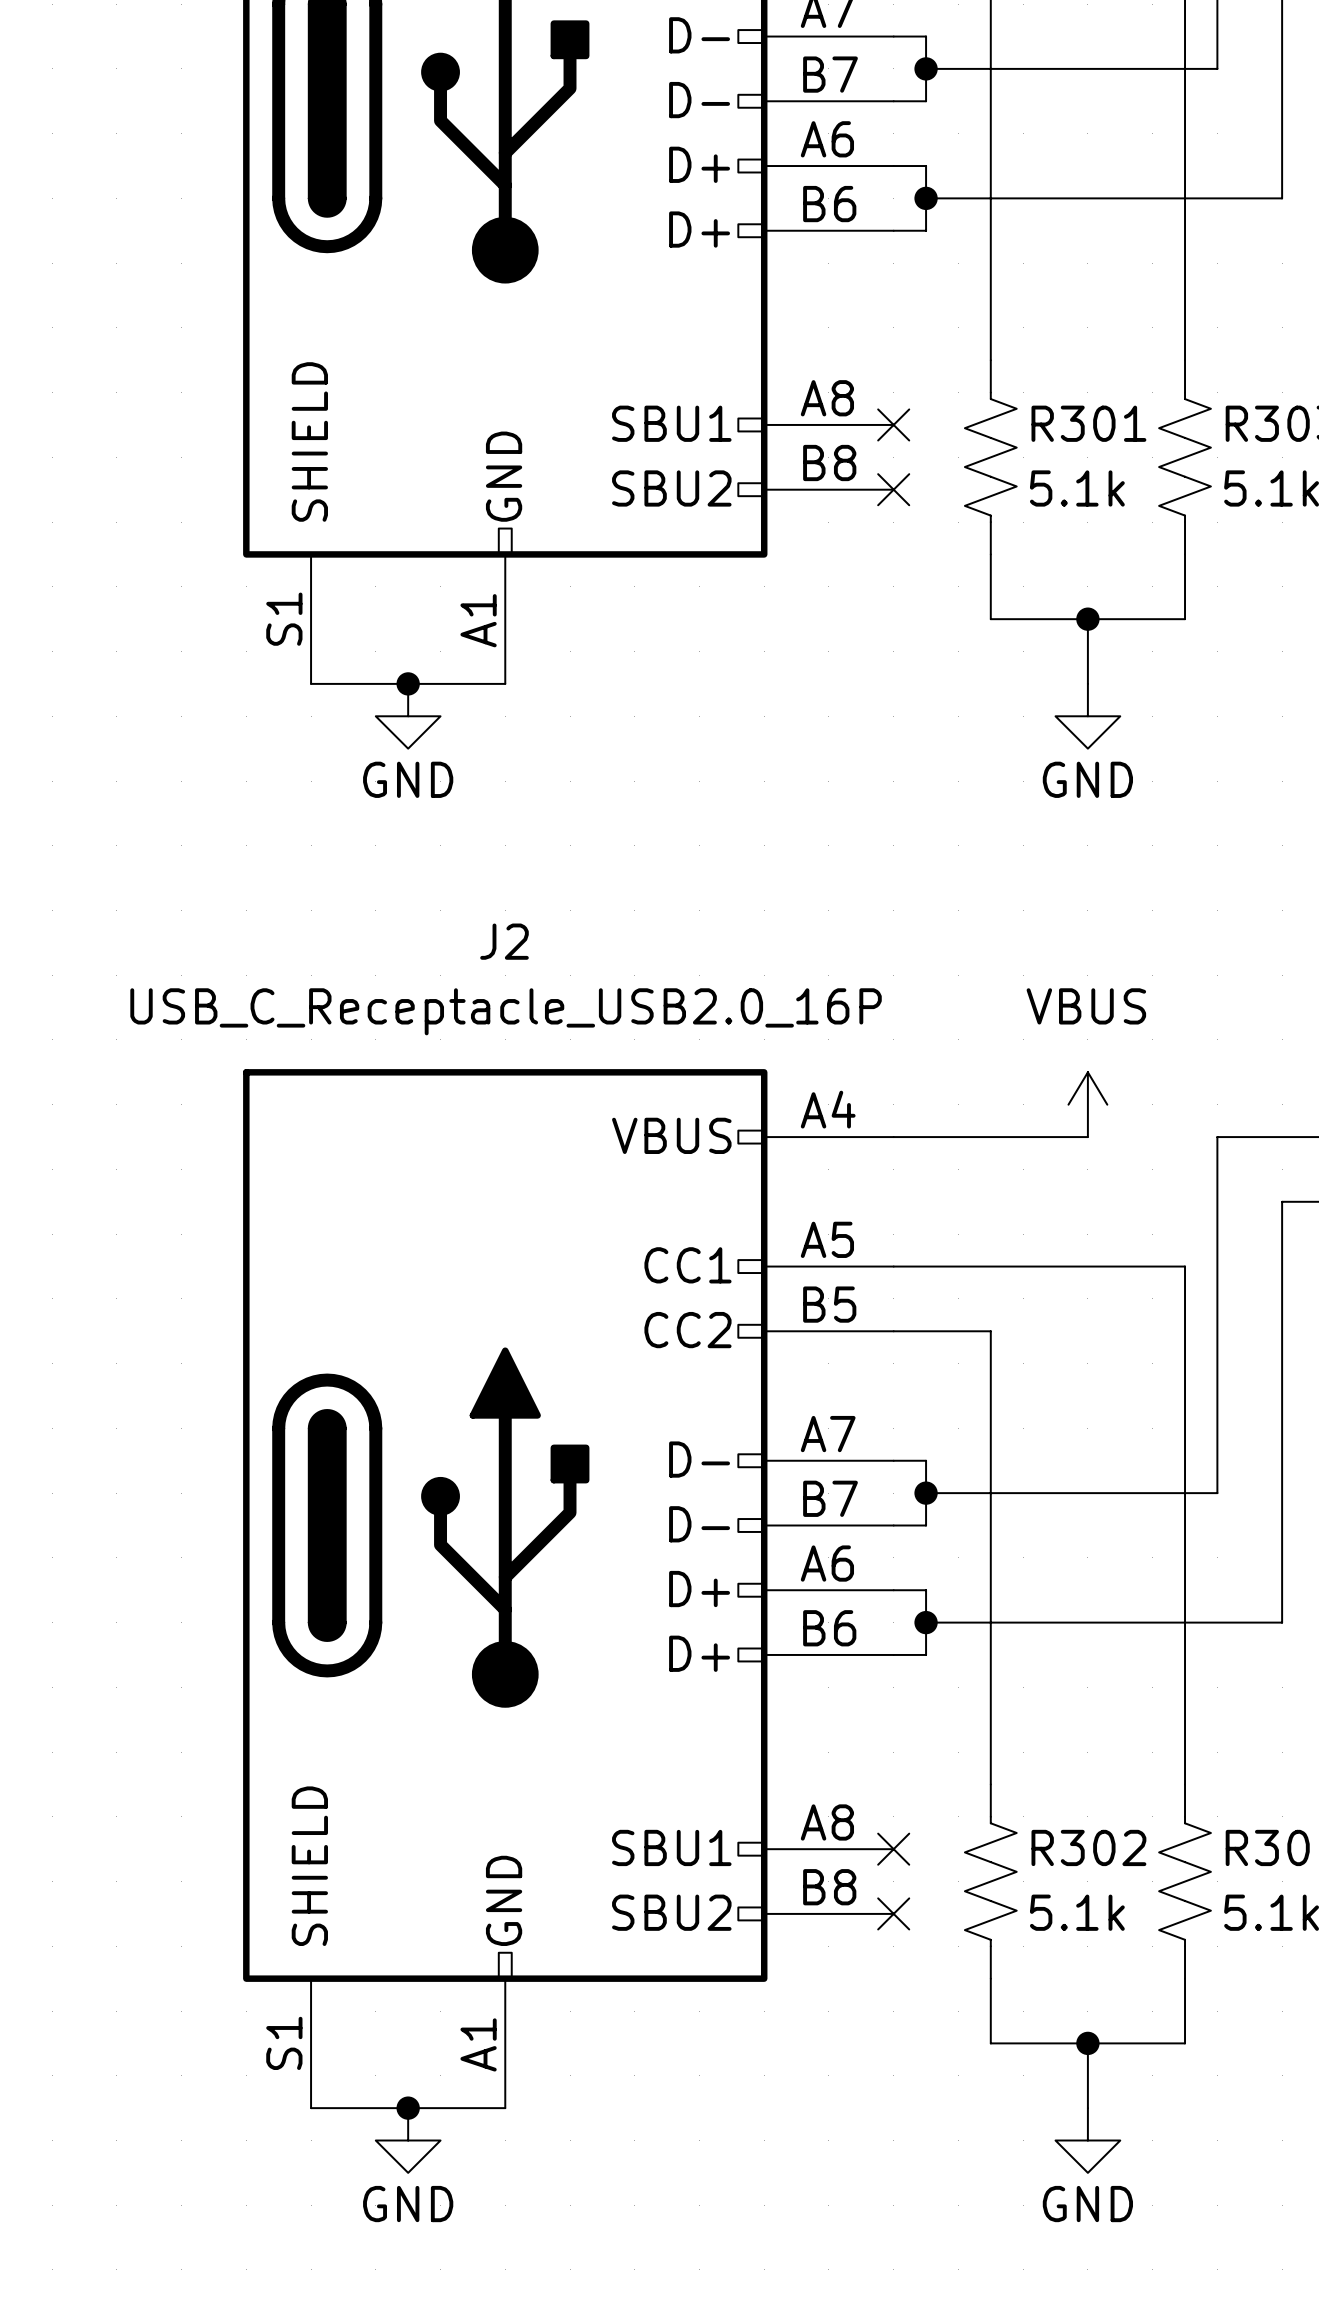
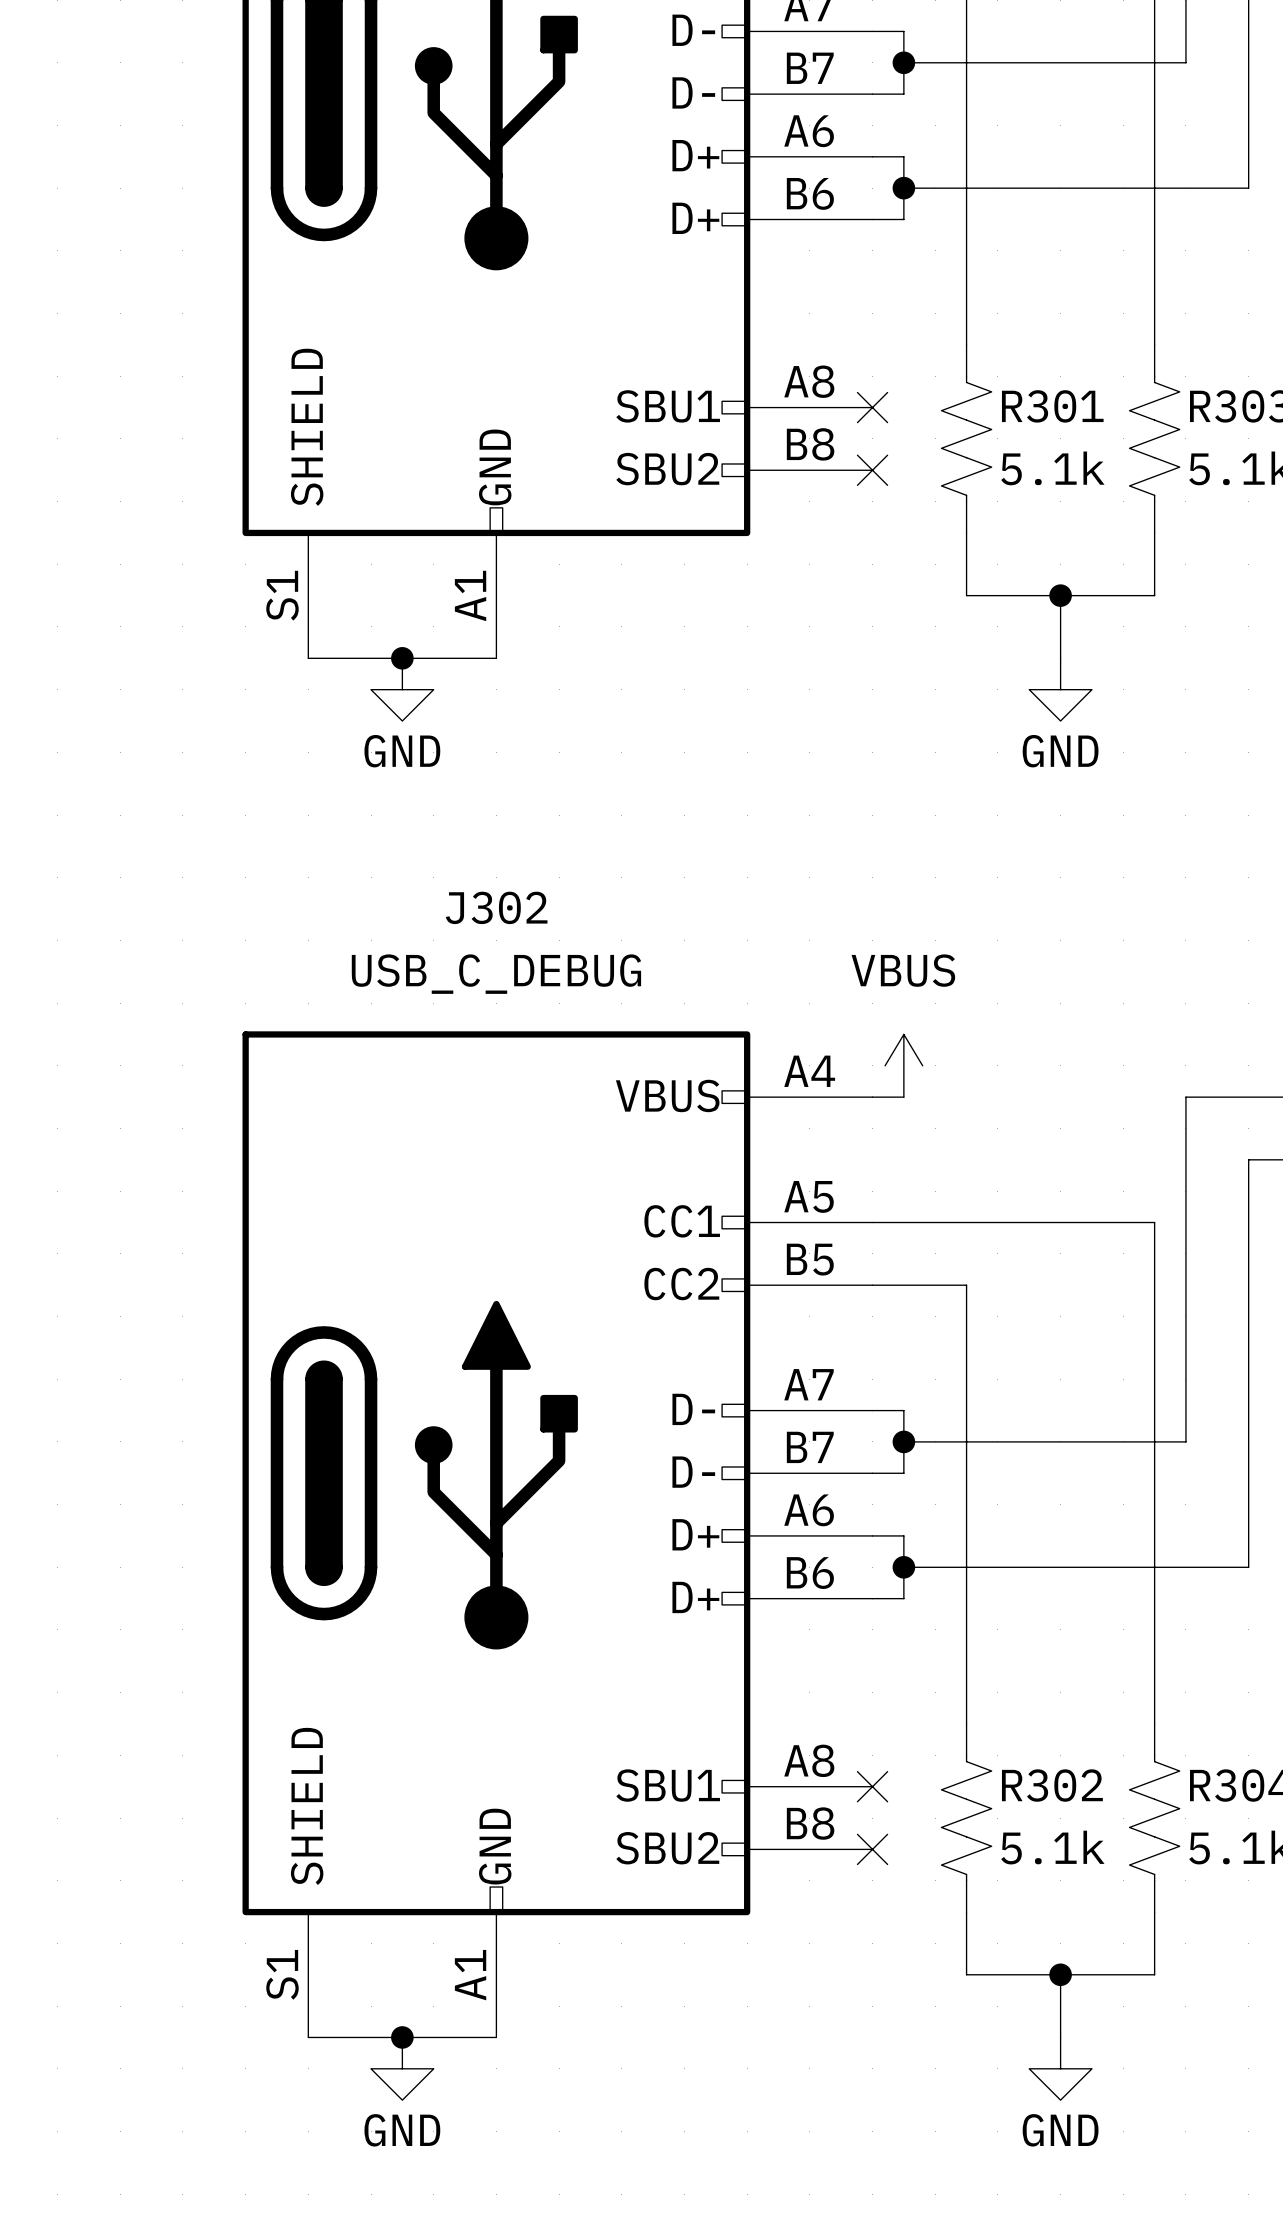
J2 name: J2 (504, 941) -> J302 (496, 907)
J2 value: USB_C_Receptacle_USB2.0_16P (506, 1011) -> USB_C_DEBUG (496, 974)
power symbol position: VBUS (1087, 1104) -> VBUS (903, 1065)
wire: (926, 1137) (1087, 1137) -> none

